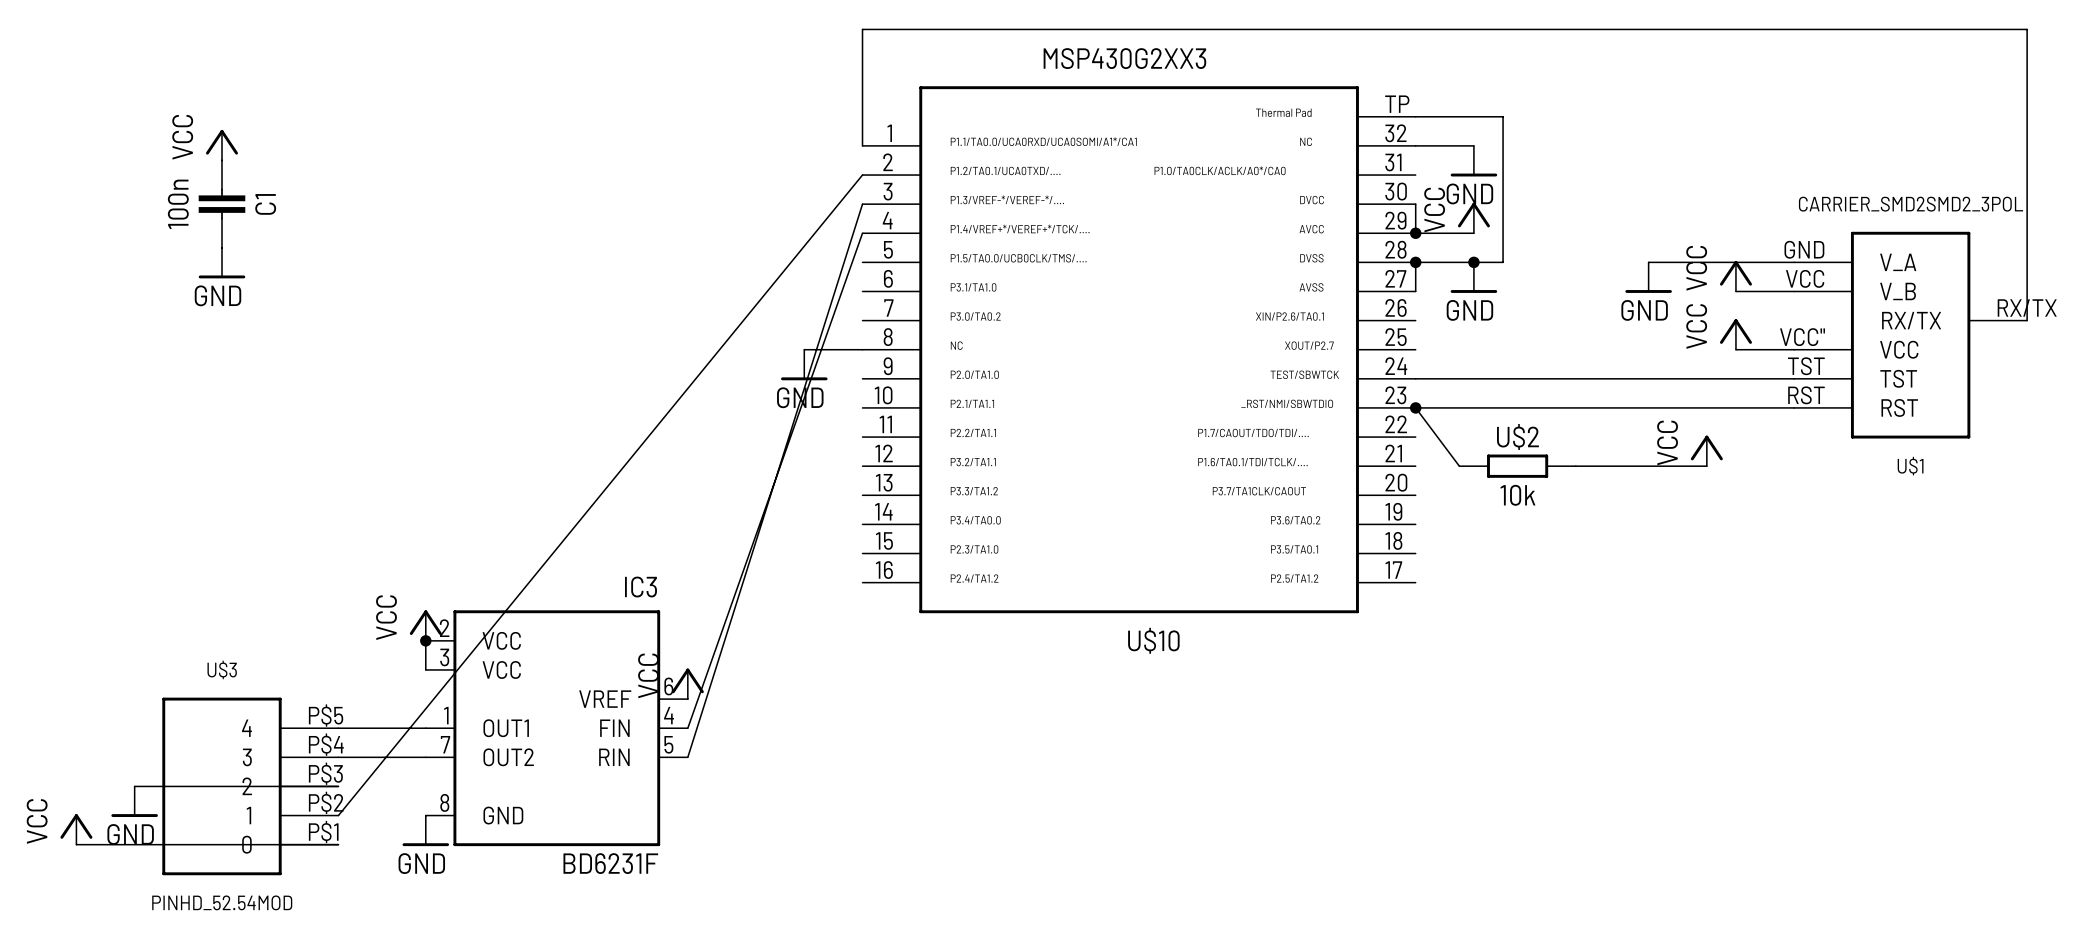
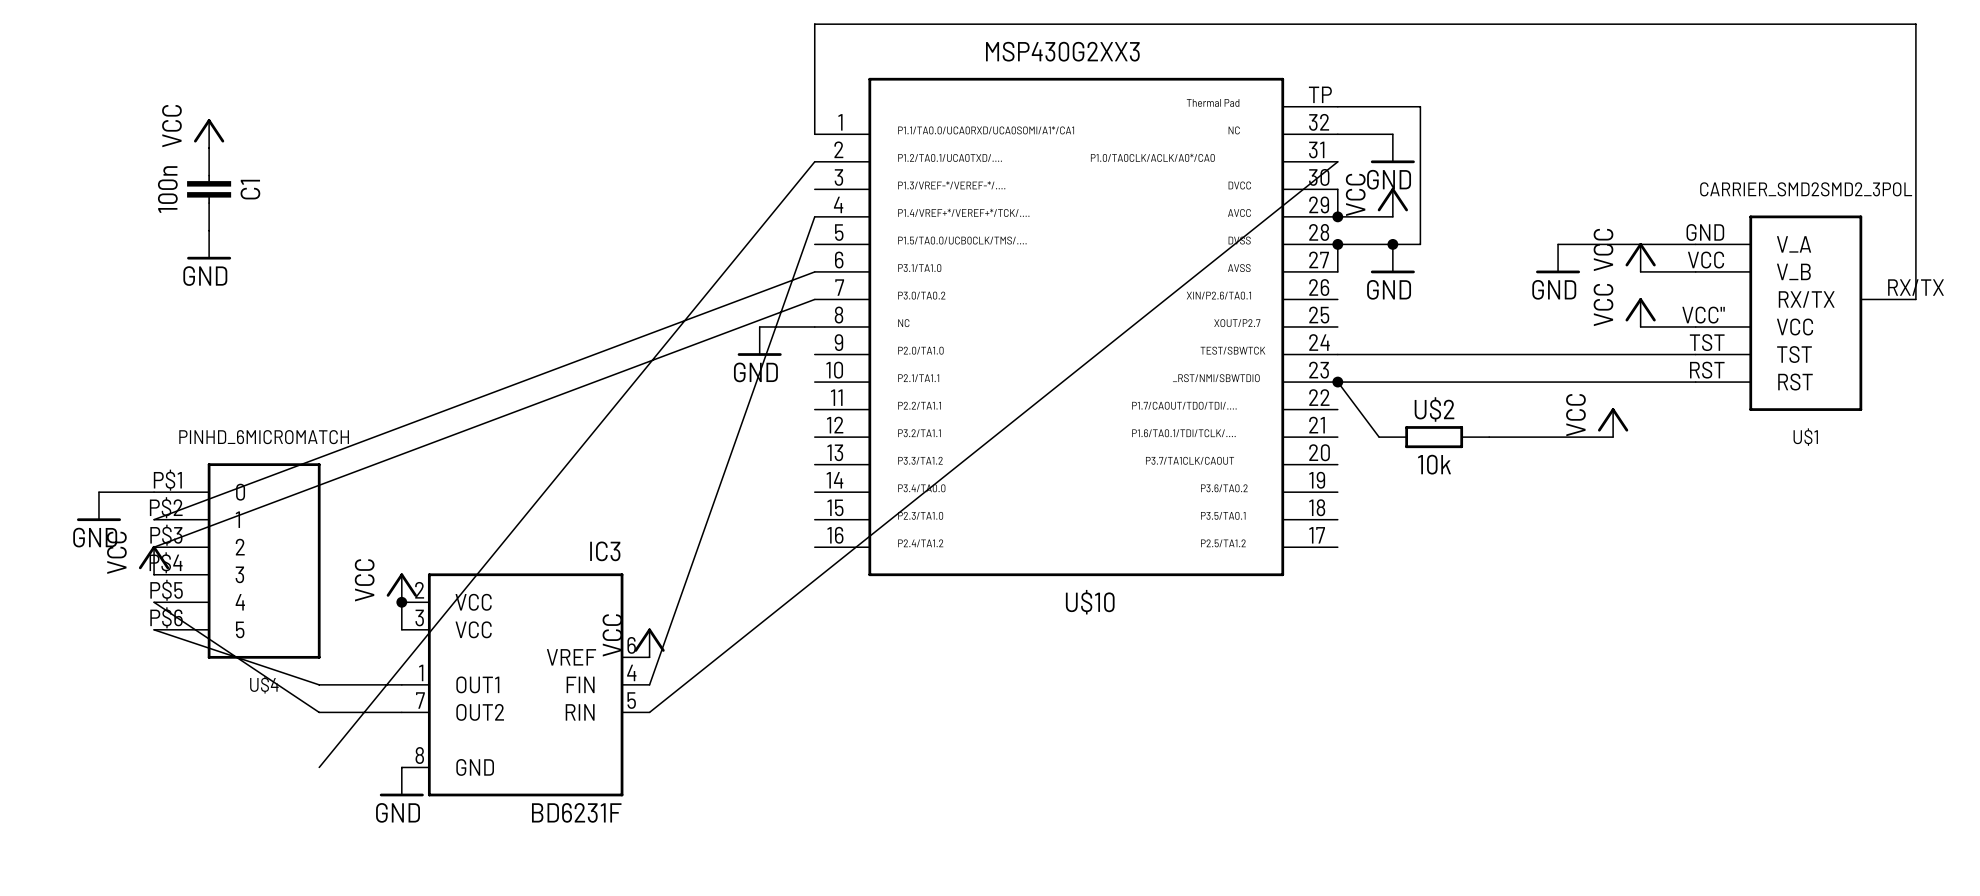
wire: (862, 204) (687, 757) -> (1337, 161) (649, 712)
wire: none -> (814, 271) (154, 519)
wire: none -> (814, 299) (154, 547)
wire: none -> (98, 492) (154, 492)
U$4: none -> PINHD_6MICROMATCH (237, 560)
wire: none -> (154, 602) (319, 712)
wire: none -> (154, 629) (319, 684)
wire: (134, 786) (338, 786) -> none
U$3: PINHD_52.54MOD (250, 786) -> none
power symbol position: GND (134, 801) -> GND (98, 506)
power symbol position: VCC (76, 829) -> VCC (154, 560)
wire: (76, 844) (338, 844) -> none

